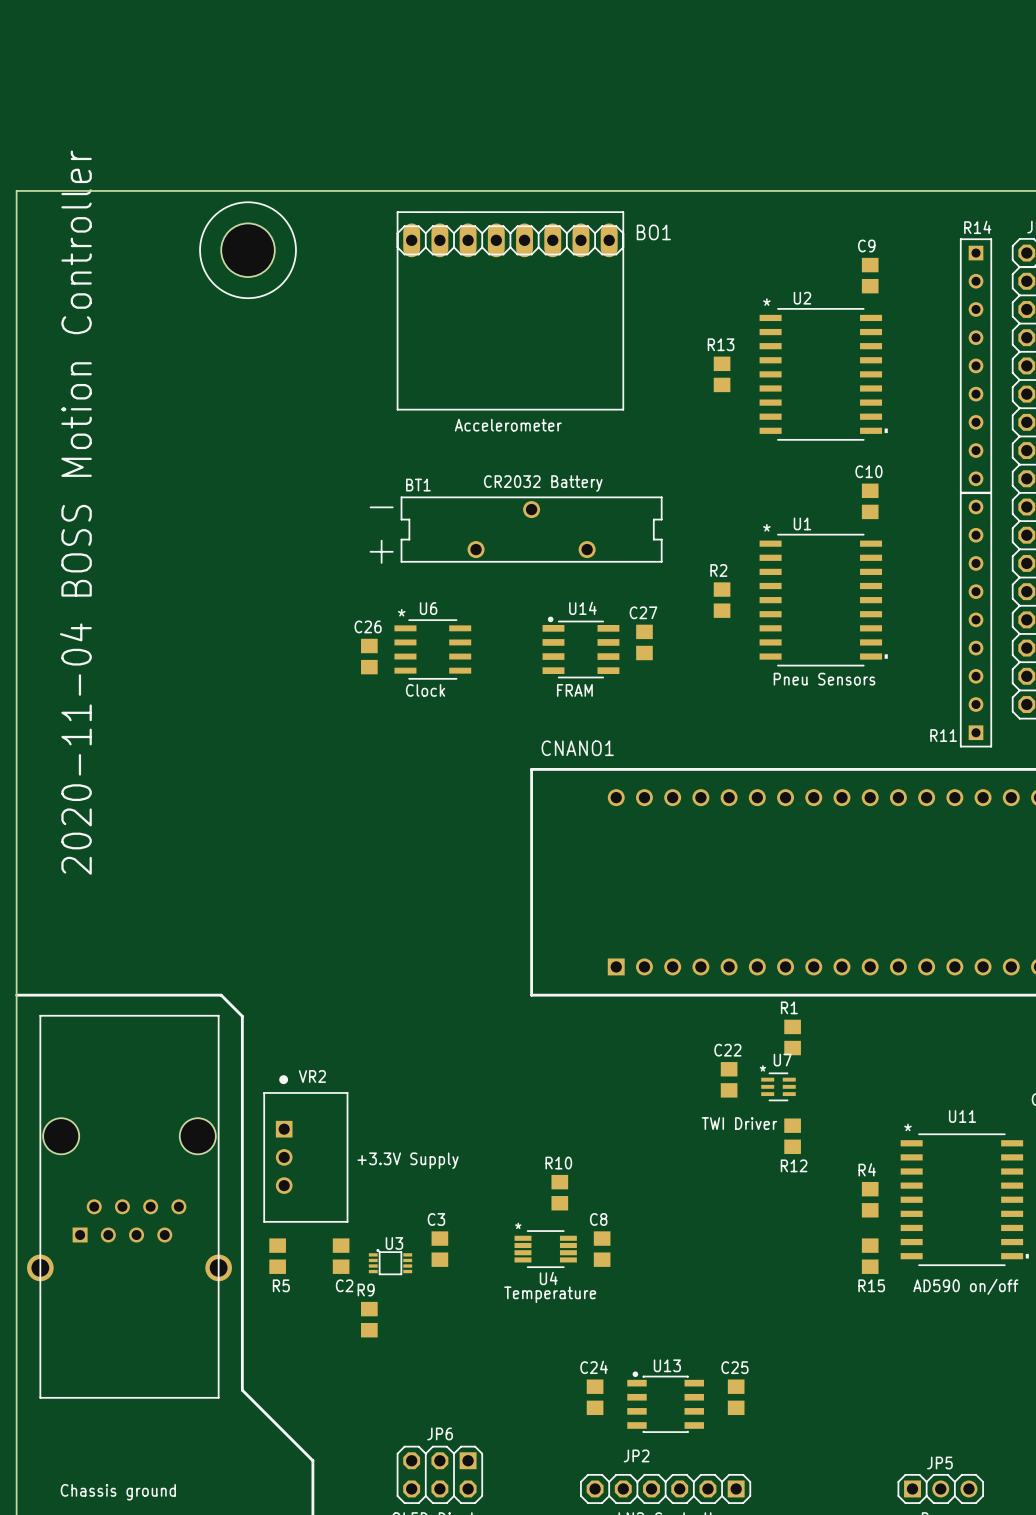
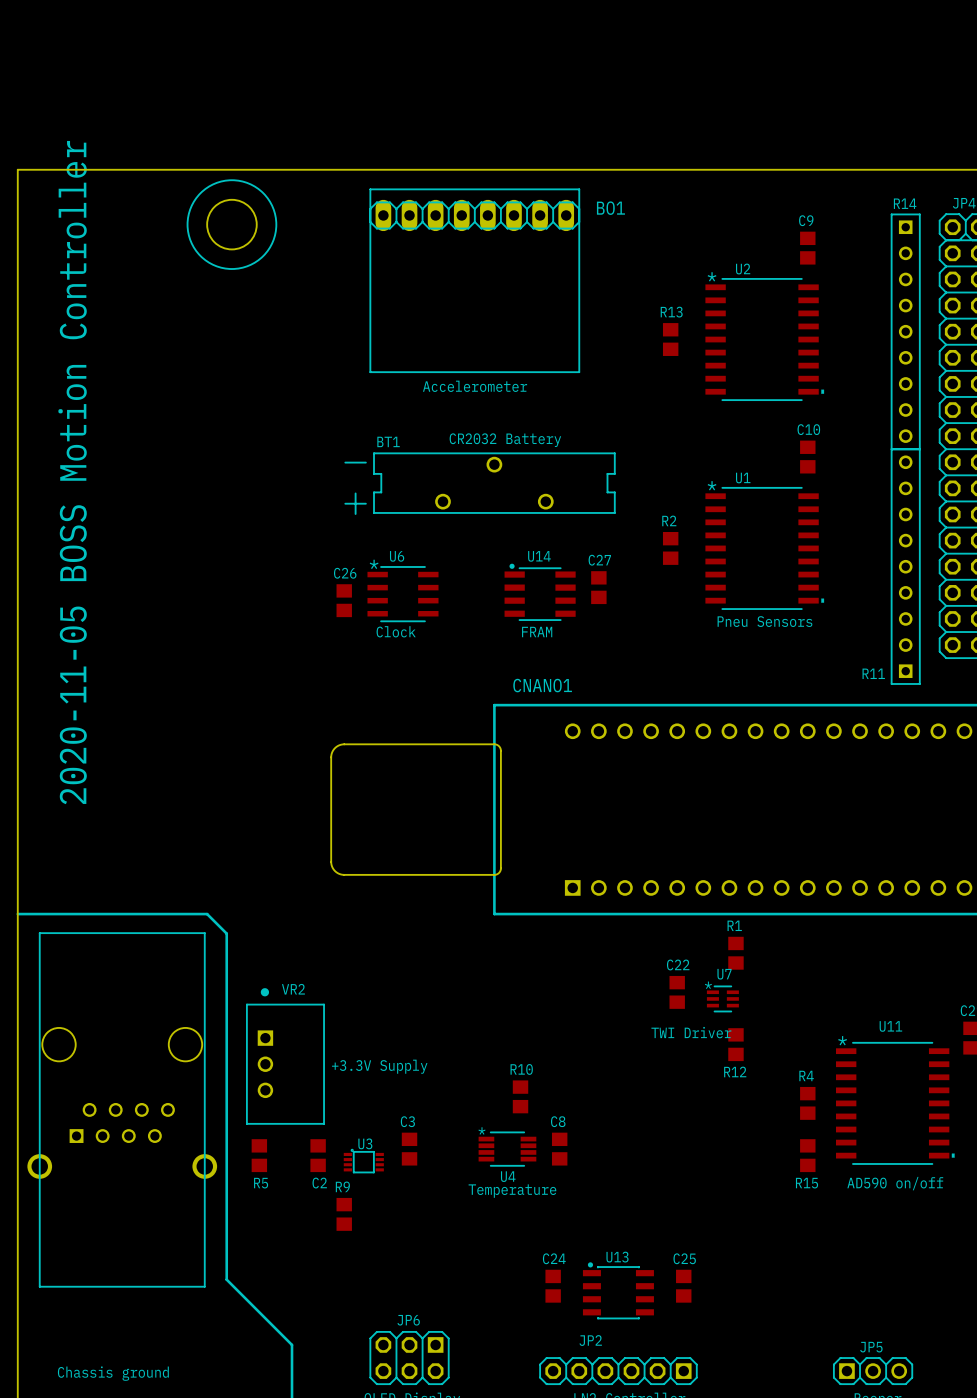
text: 2020-11-04 BOSS Motion Controller (75, 512) -> 2020-11-05 BOSS Motion Controller (72, 472)
board edge: none -> (344, 744) (498, 745) (500, 750) (499, 872) (494, 874) (344, 874) (336, 872) (331, 861) (331, 757) (335, 748) (344, 744)

